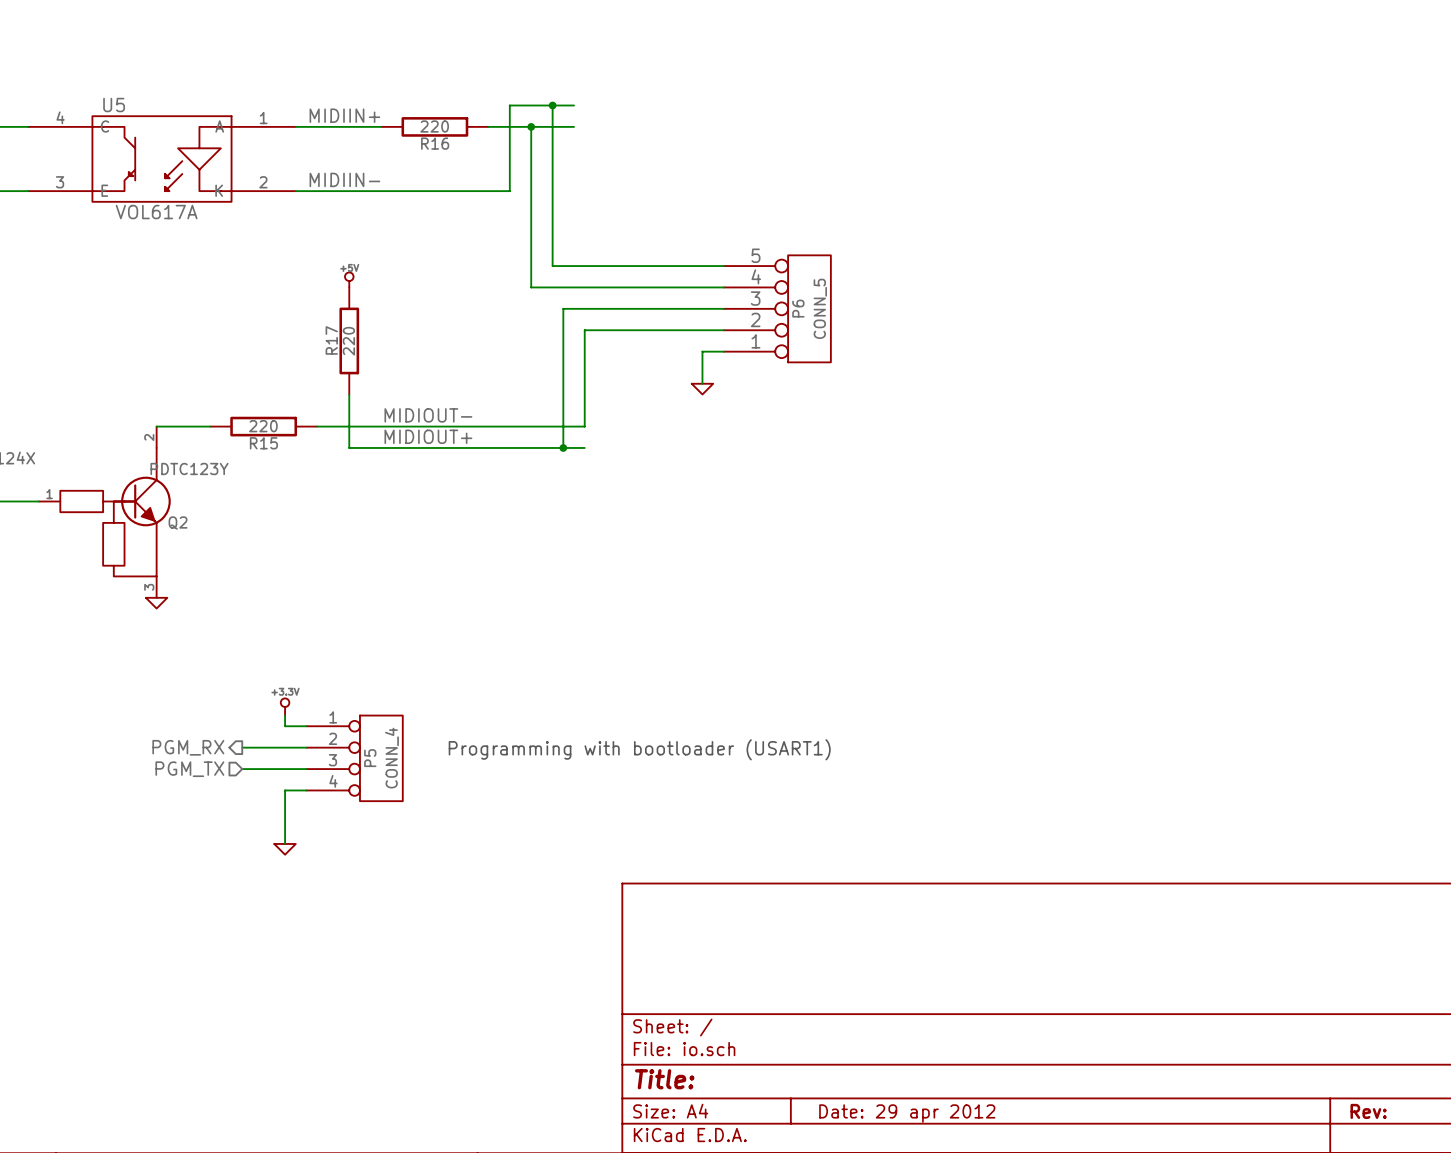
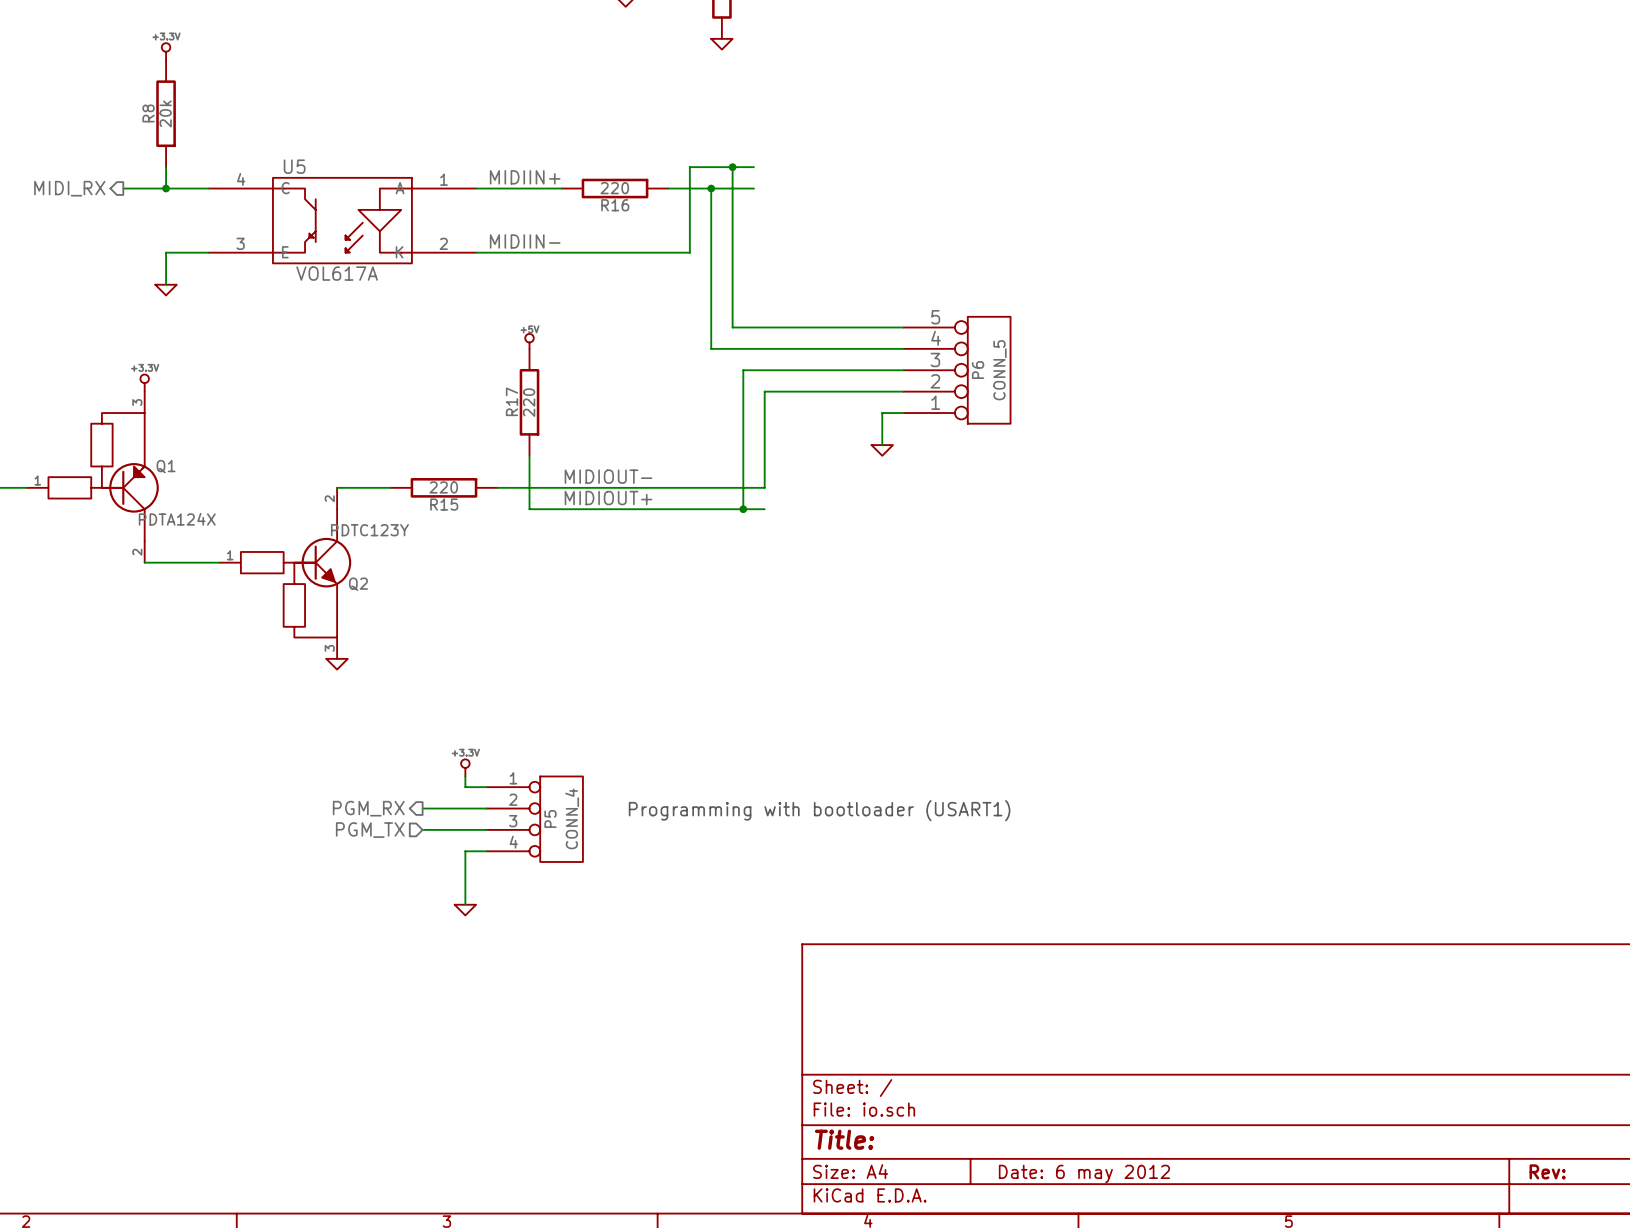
title block: Date: 29 apr 2012 (907, 1113) -> Date: 6 may 2012 (1084, 1173)

